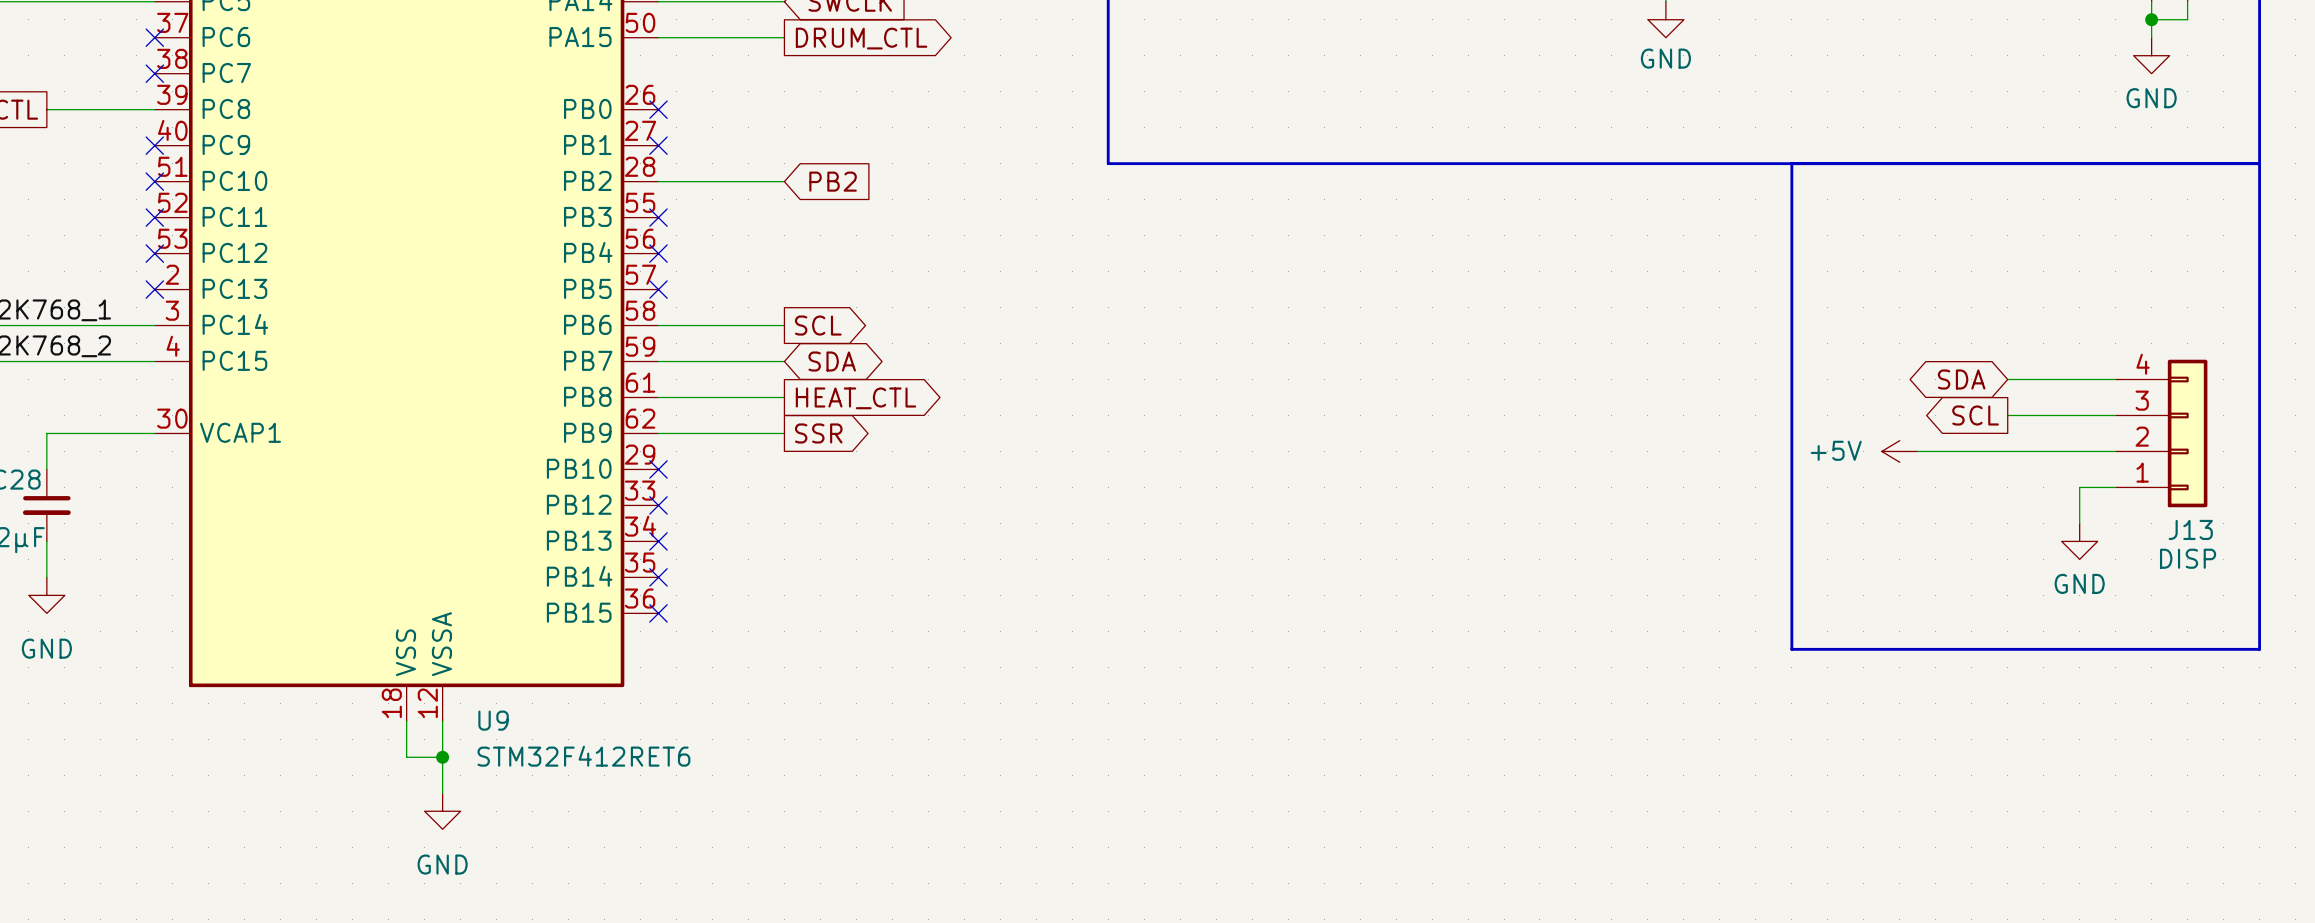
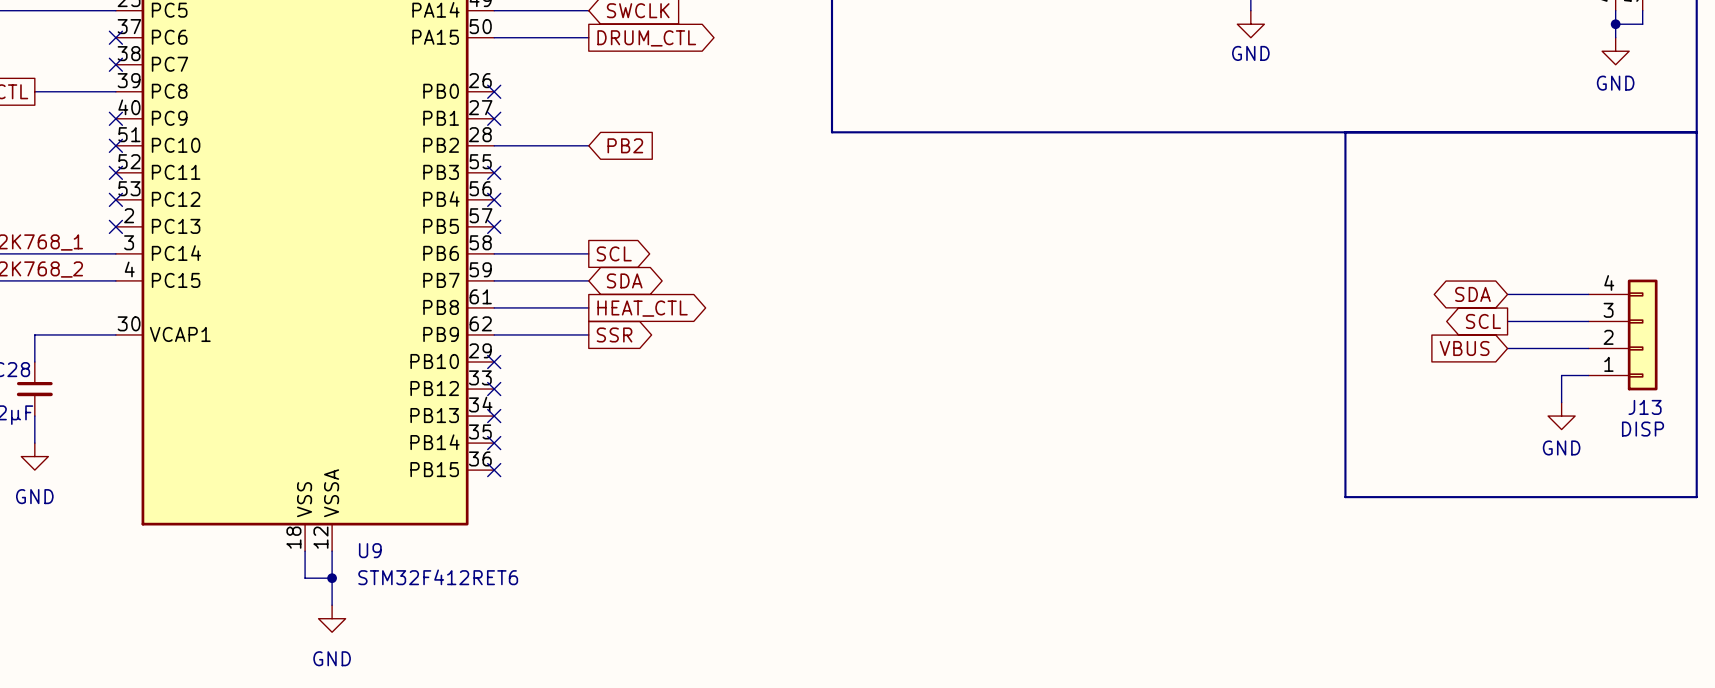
power symbol: +5V (1899, 451) -> none
wire: (1917, 451) (2007, 451) -> none
global label: none -> VBUS (1464, 348)

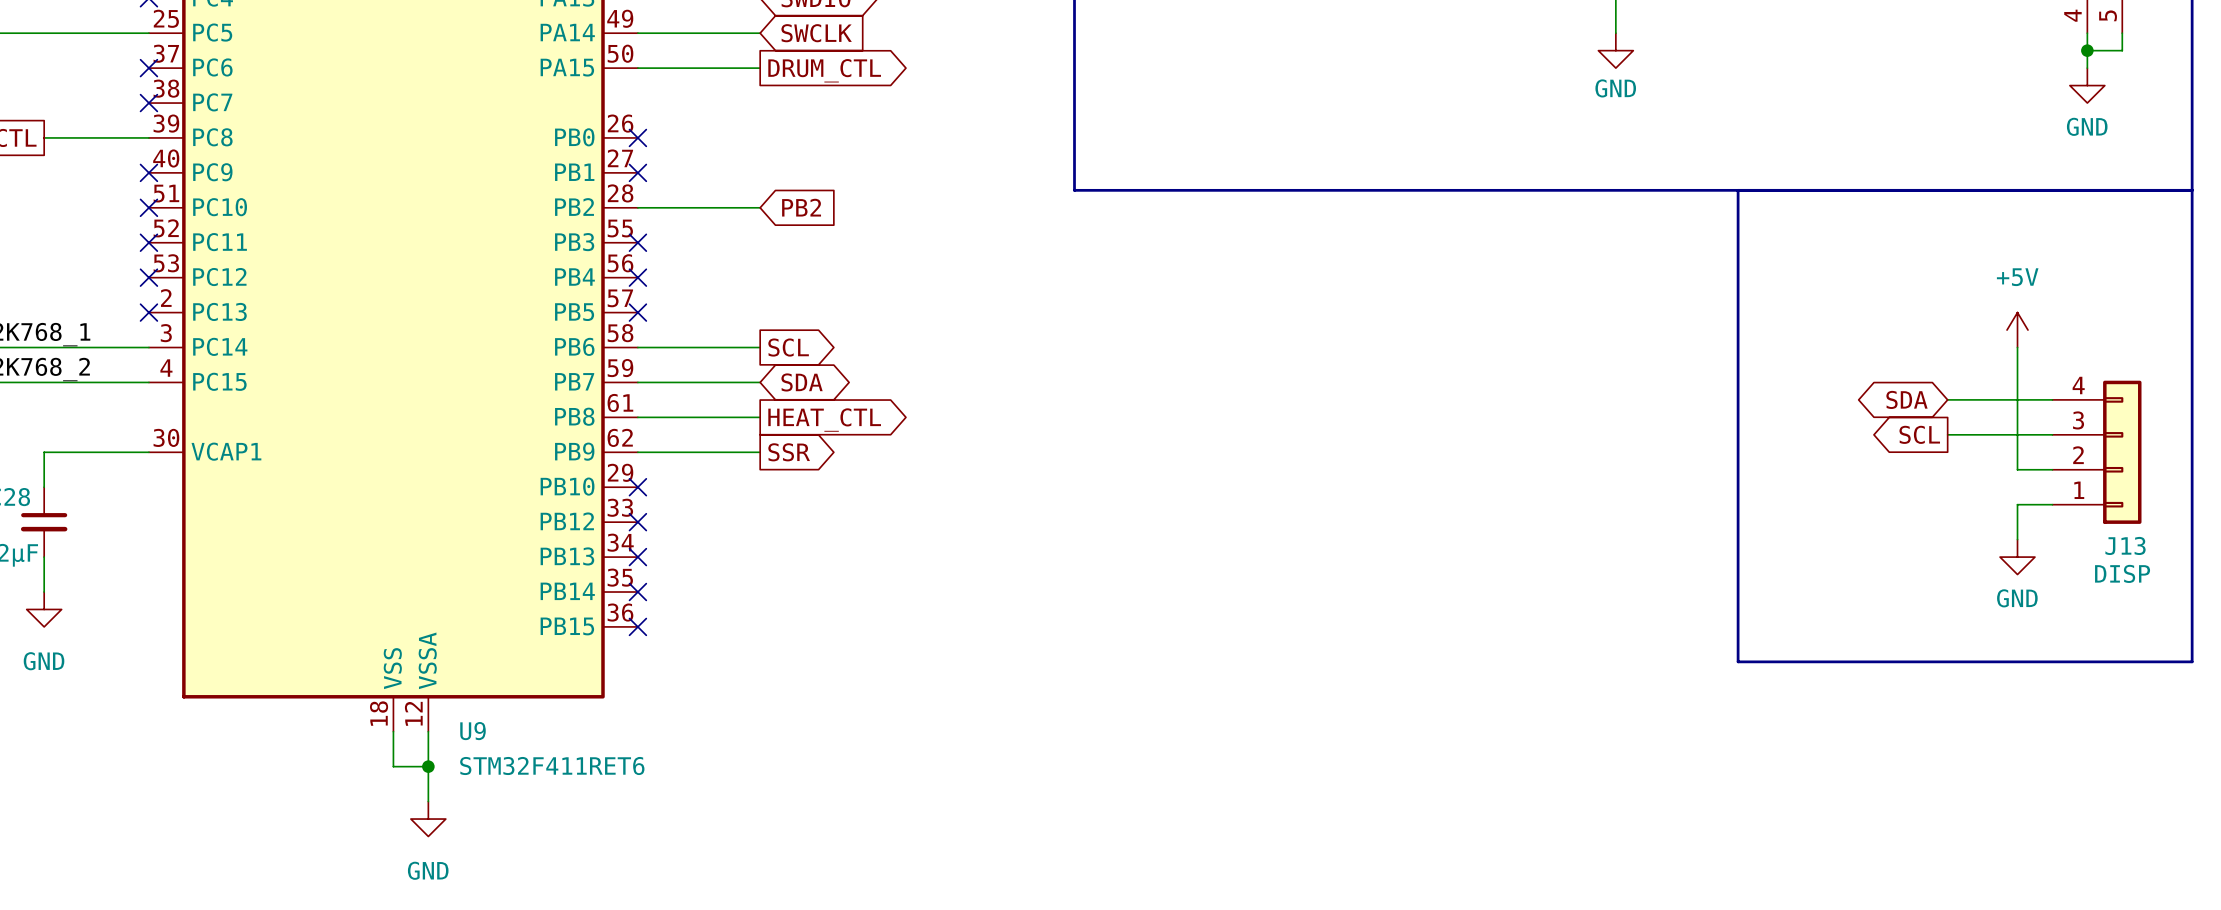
power symbol: none -> +5V (2017, 330)
global label: VBUS (1464, 348) -> none
wire: (1507, 348) (1561, 348) -> (2017, 347) (2017, 469)
U9 value: STM32F412RET6 (438, 577) -> STM32F411RET6 (552, 766)

